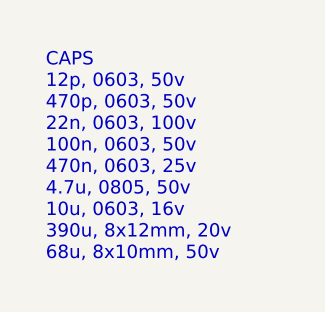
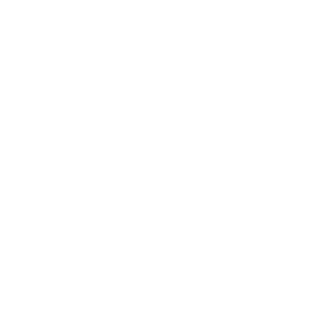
text: CAPS (69, 57) -> none
text: 12p, 0603, 50v (115, 81) -> none
text: 470p, 0603, 50v (121, 102) -> none
text: 22n, 0603, 100v (121, 123) -> none
text: 100n, 0603, 50v (121, 144) -> none
text: 470n, 0603, 25v (121, 166) -> none
text: 4.7u, 0805, 50v (118, 187) -> none
text: 10u, 0603, 16v (115, 209) -> none
text: 390u, 8x12mm, 20v (138, 230) -> none
text: 68u, 8x10mm, 50v (133, 252) -> none

